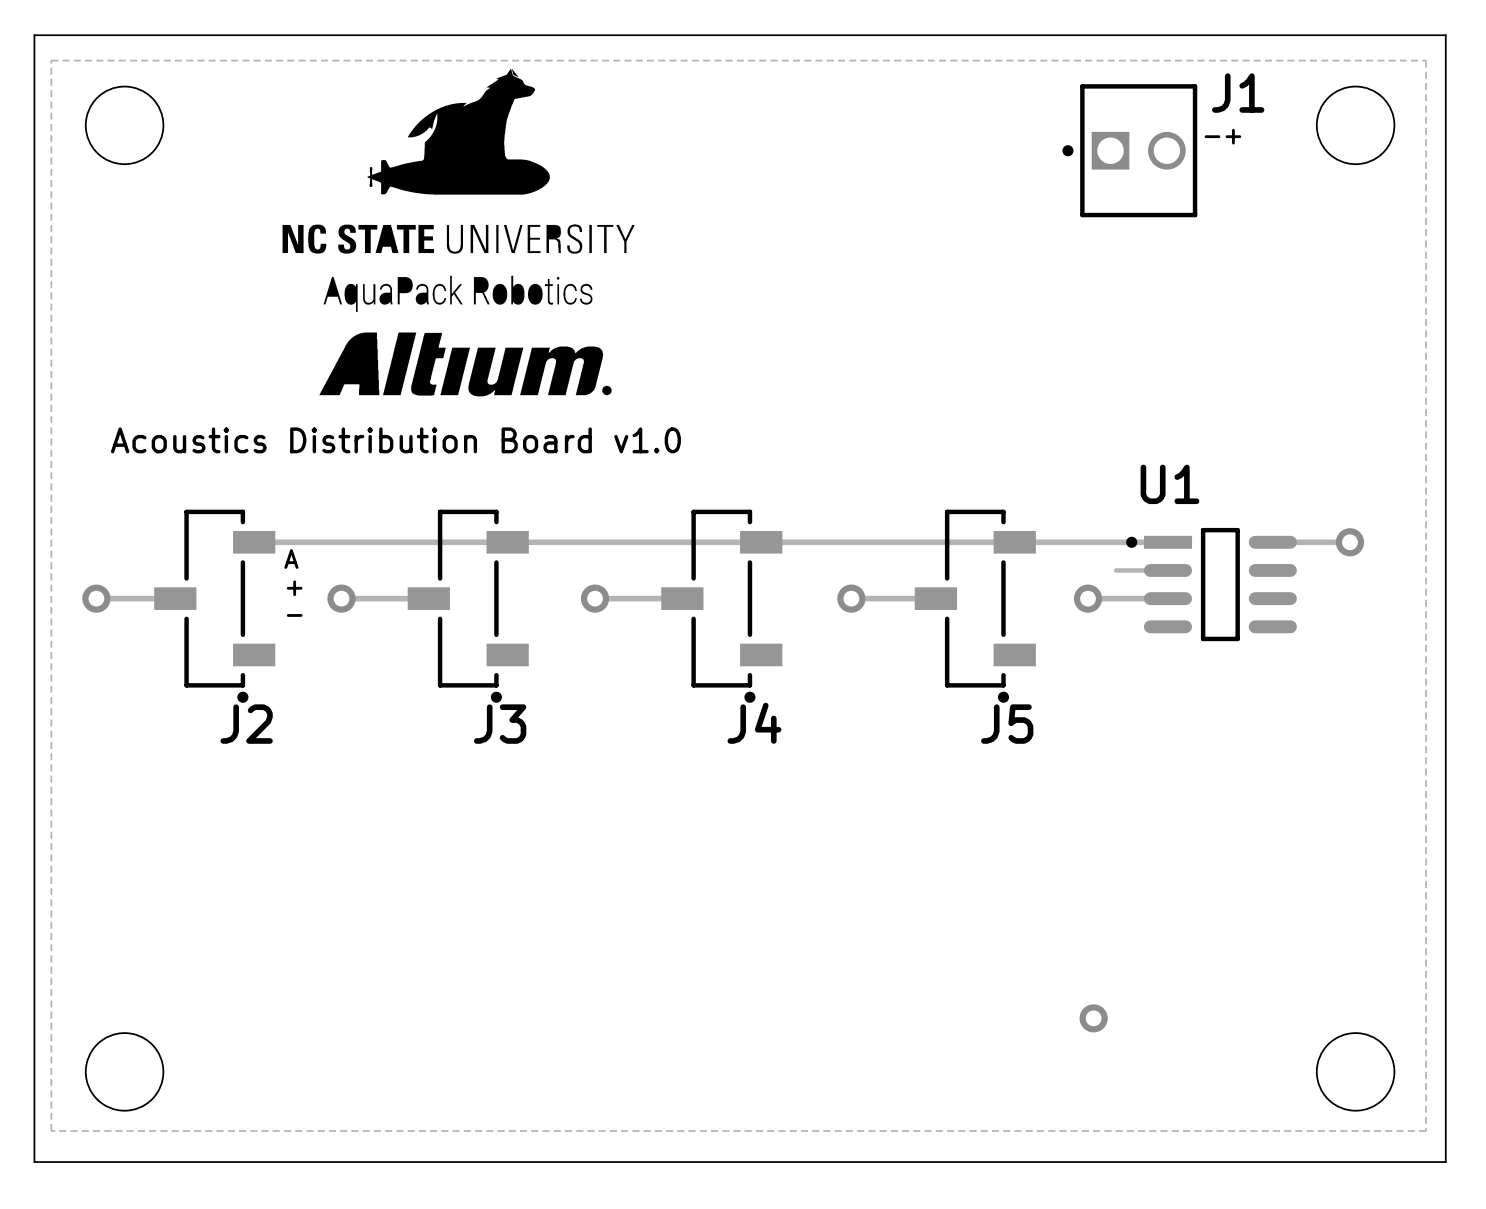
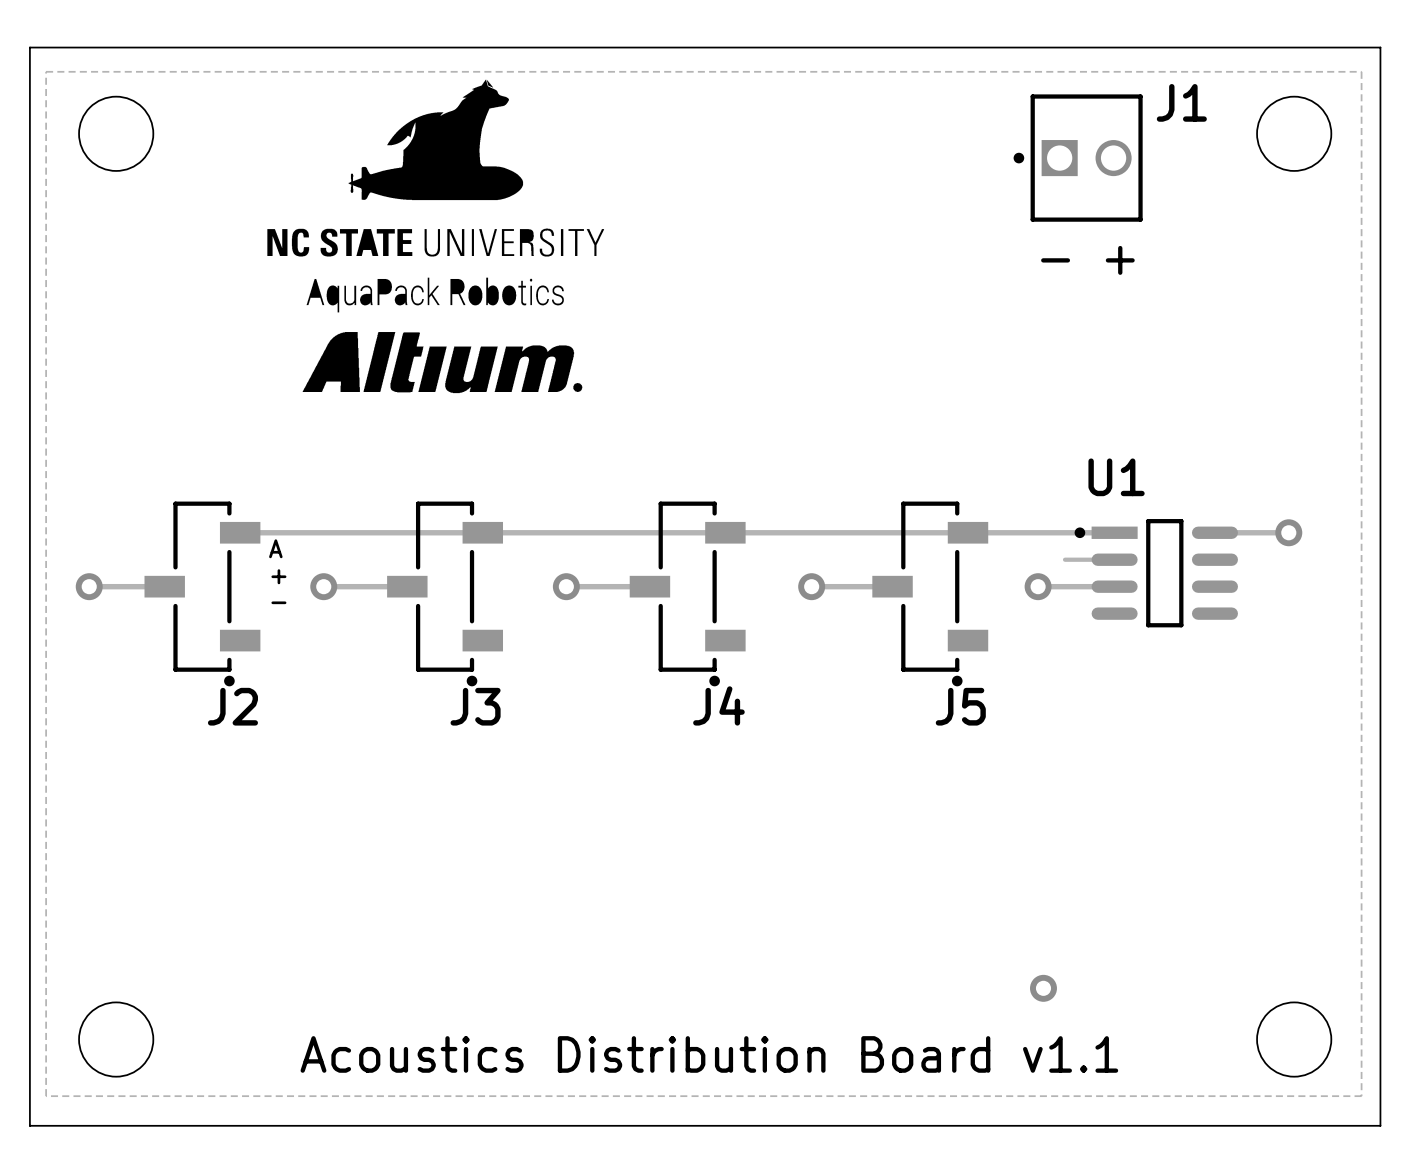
text: +- (1222, 136) -> none
text: none -> - + (1087, 260)
text: Acoustics Distribution Board v1.0 (395, 440) -> none
text: none -> Acoustics Distribution Board v1.1 (709, 1054)

